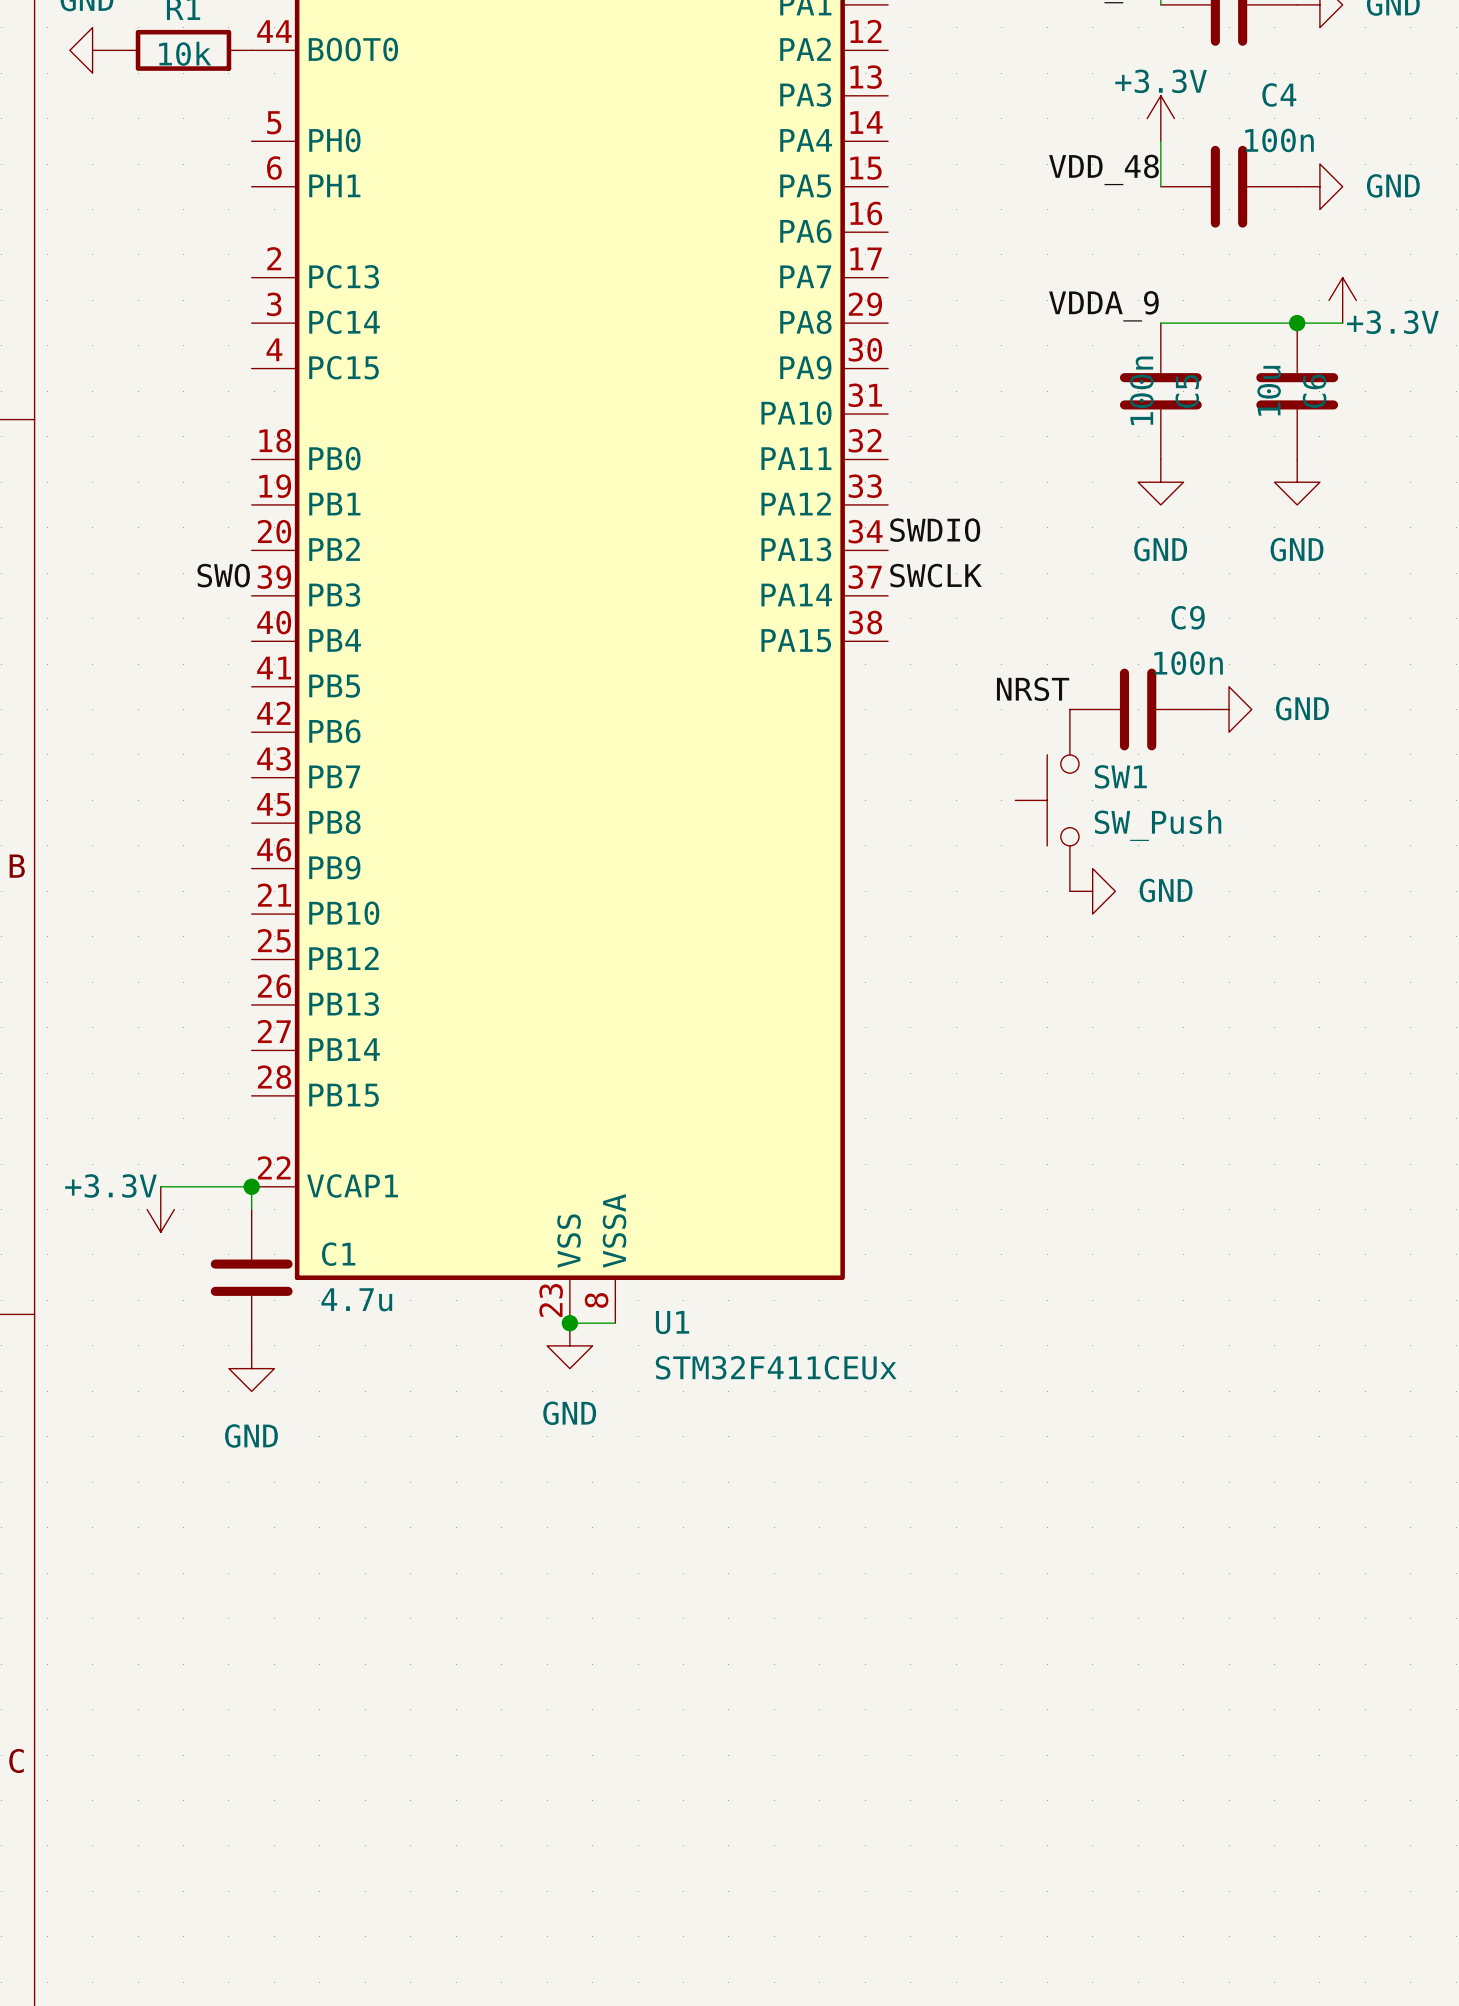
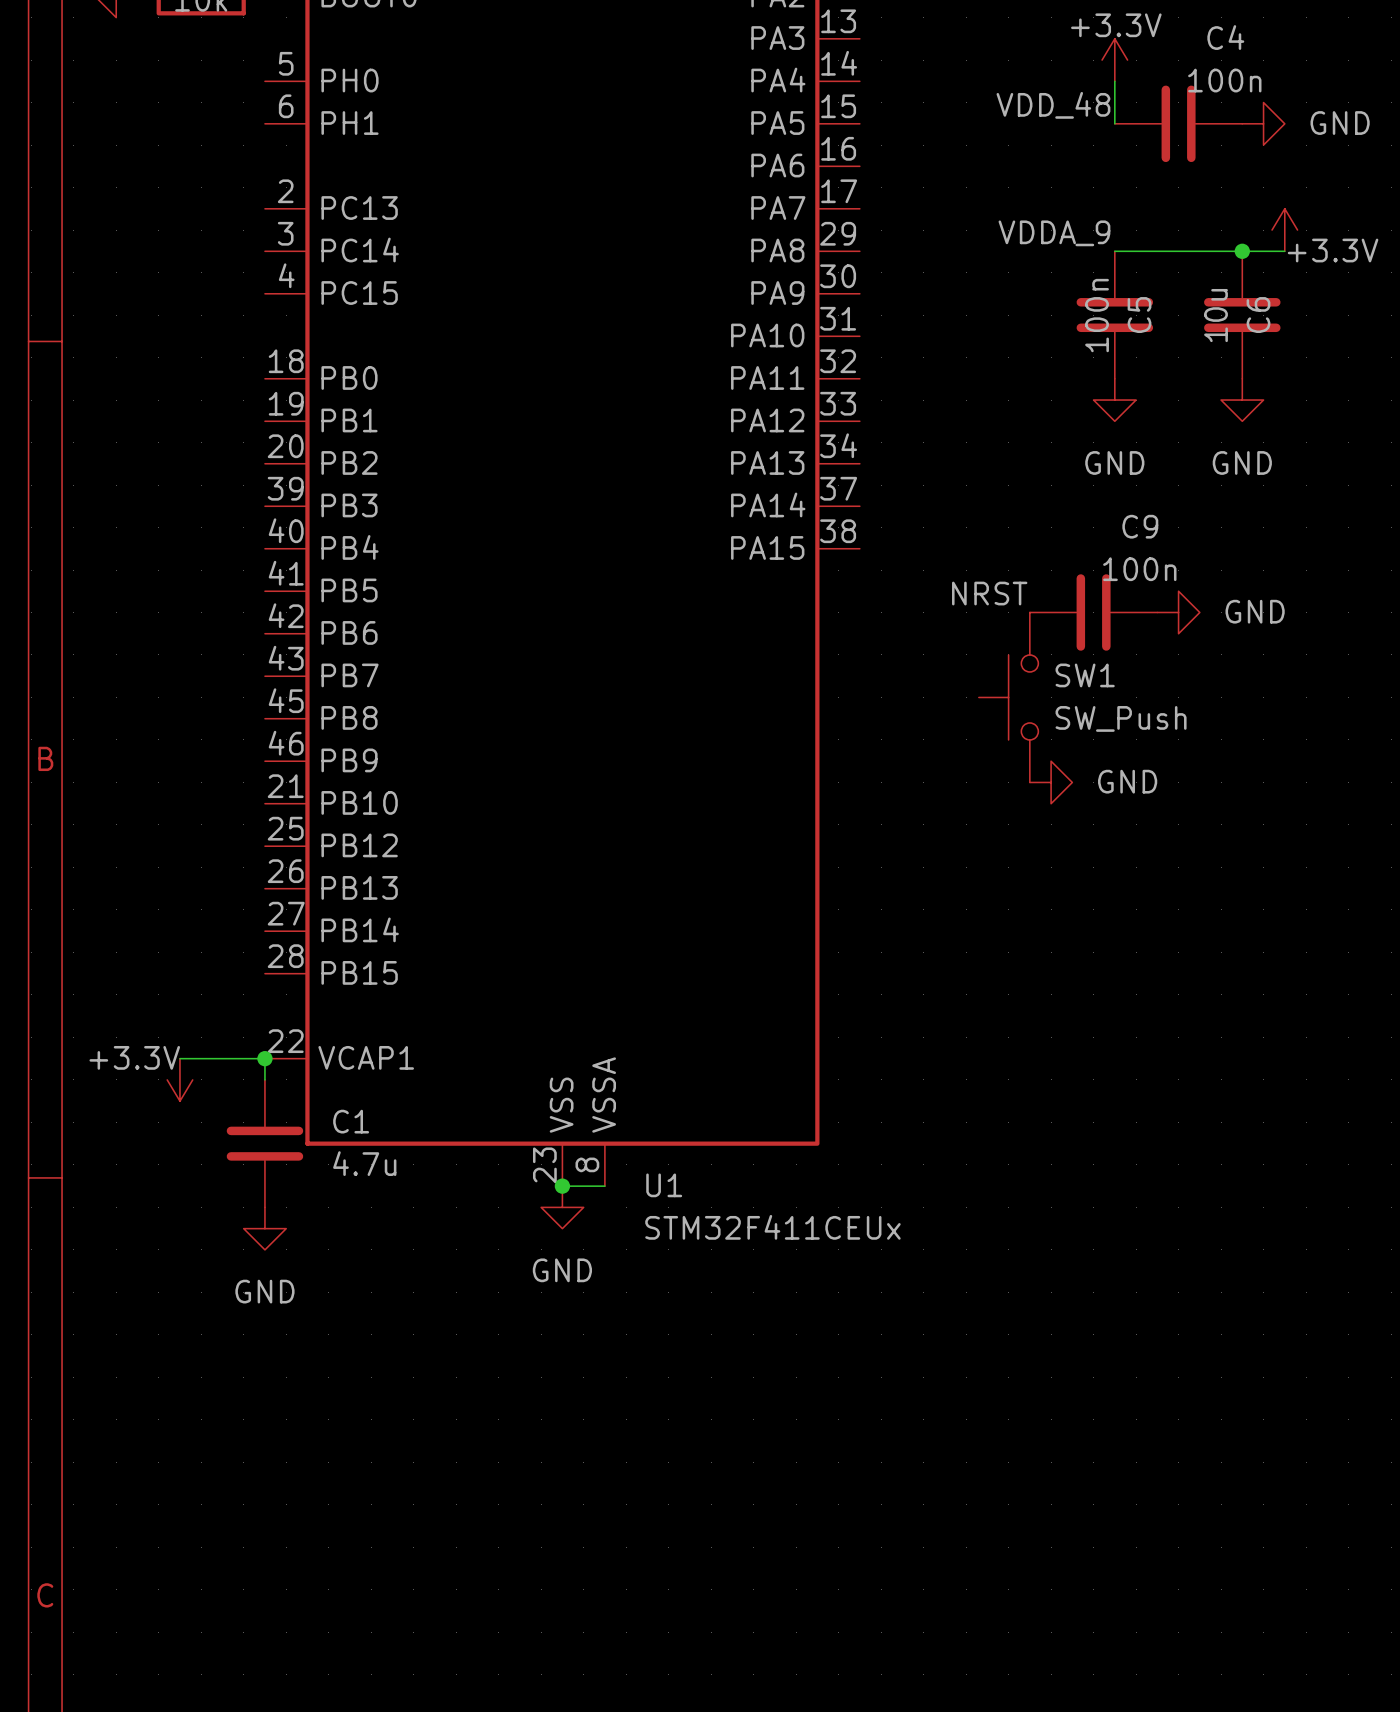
label: SWDIO (935, 530) -> none
label: SWO (223, 575) -> none
label: SWCLK (936, 575) -> none

